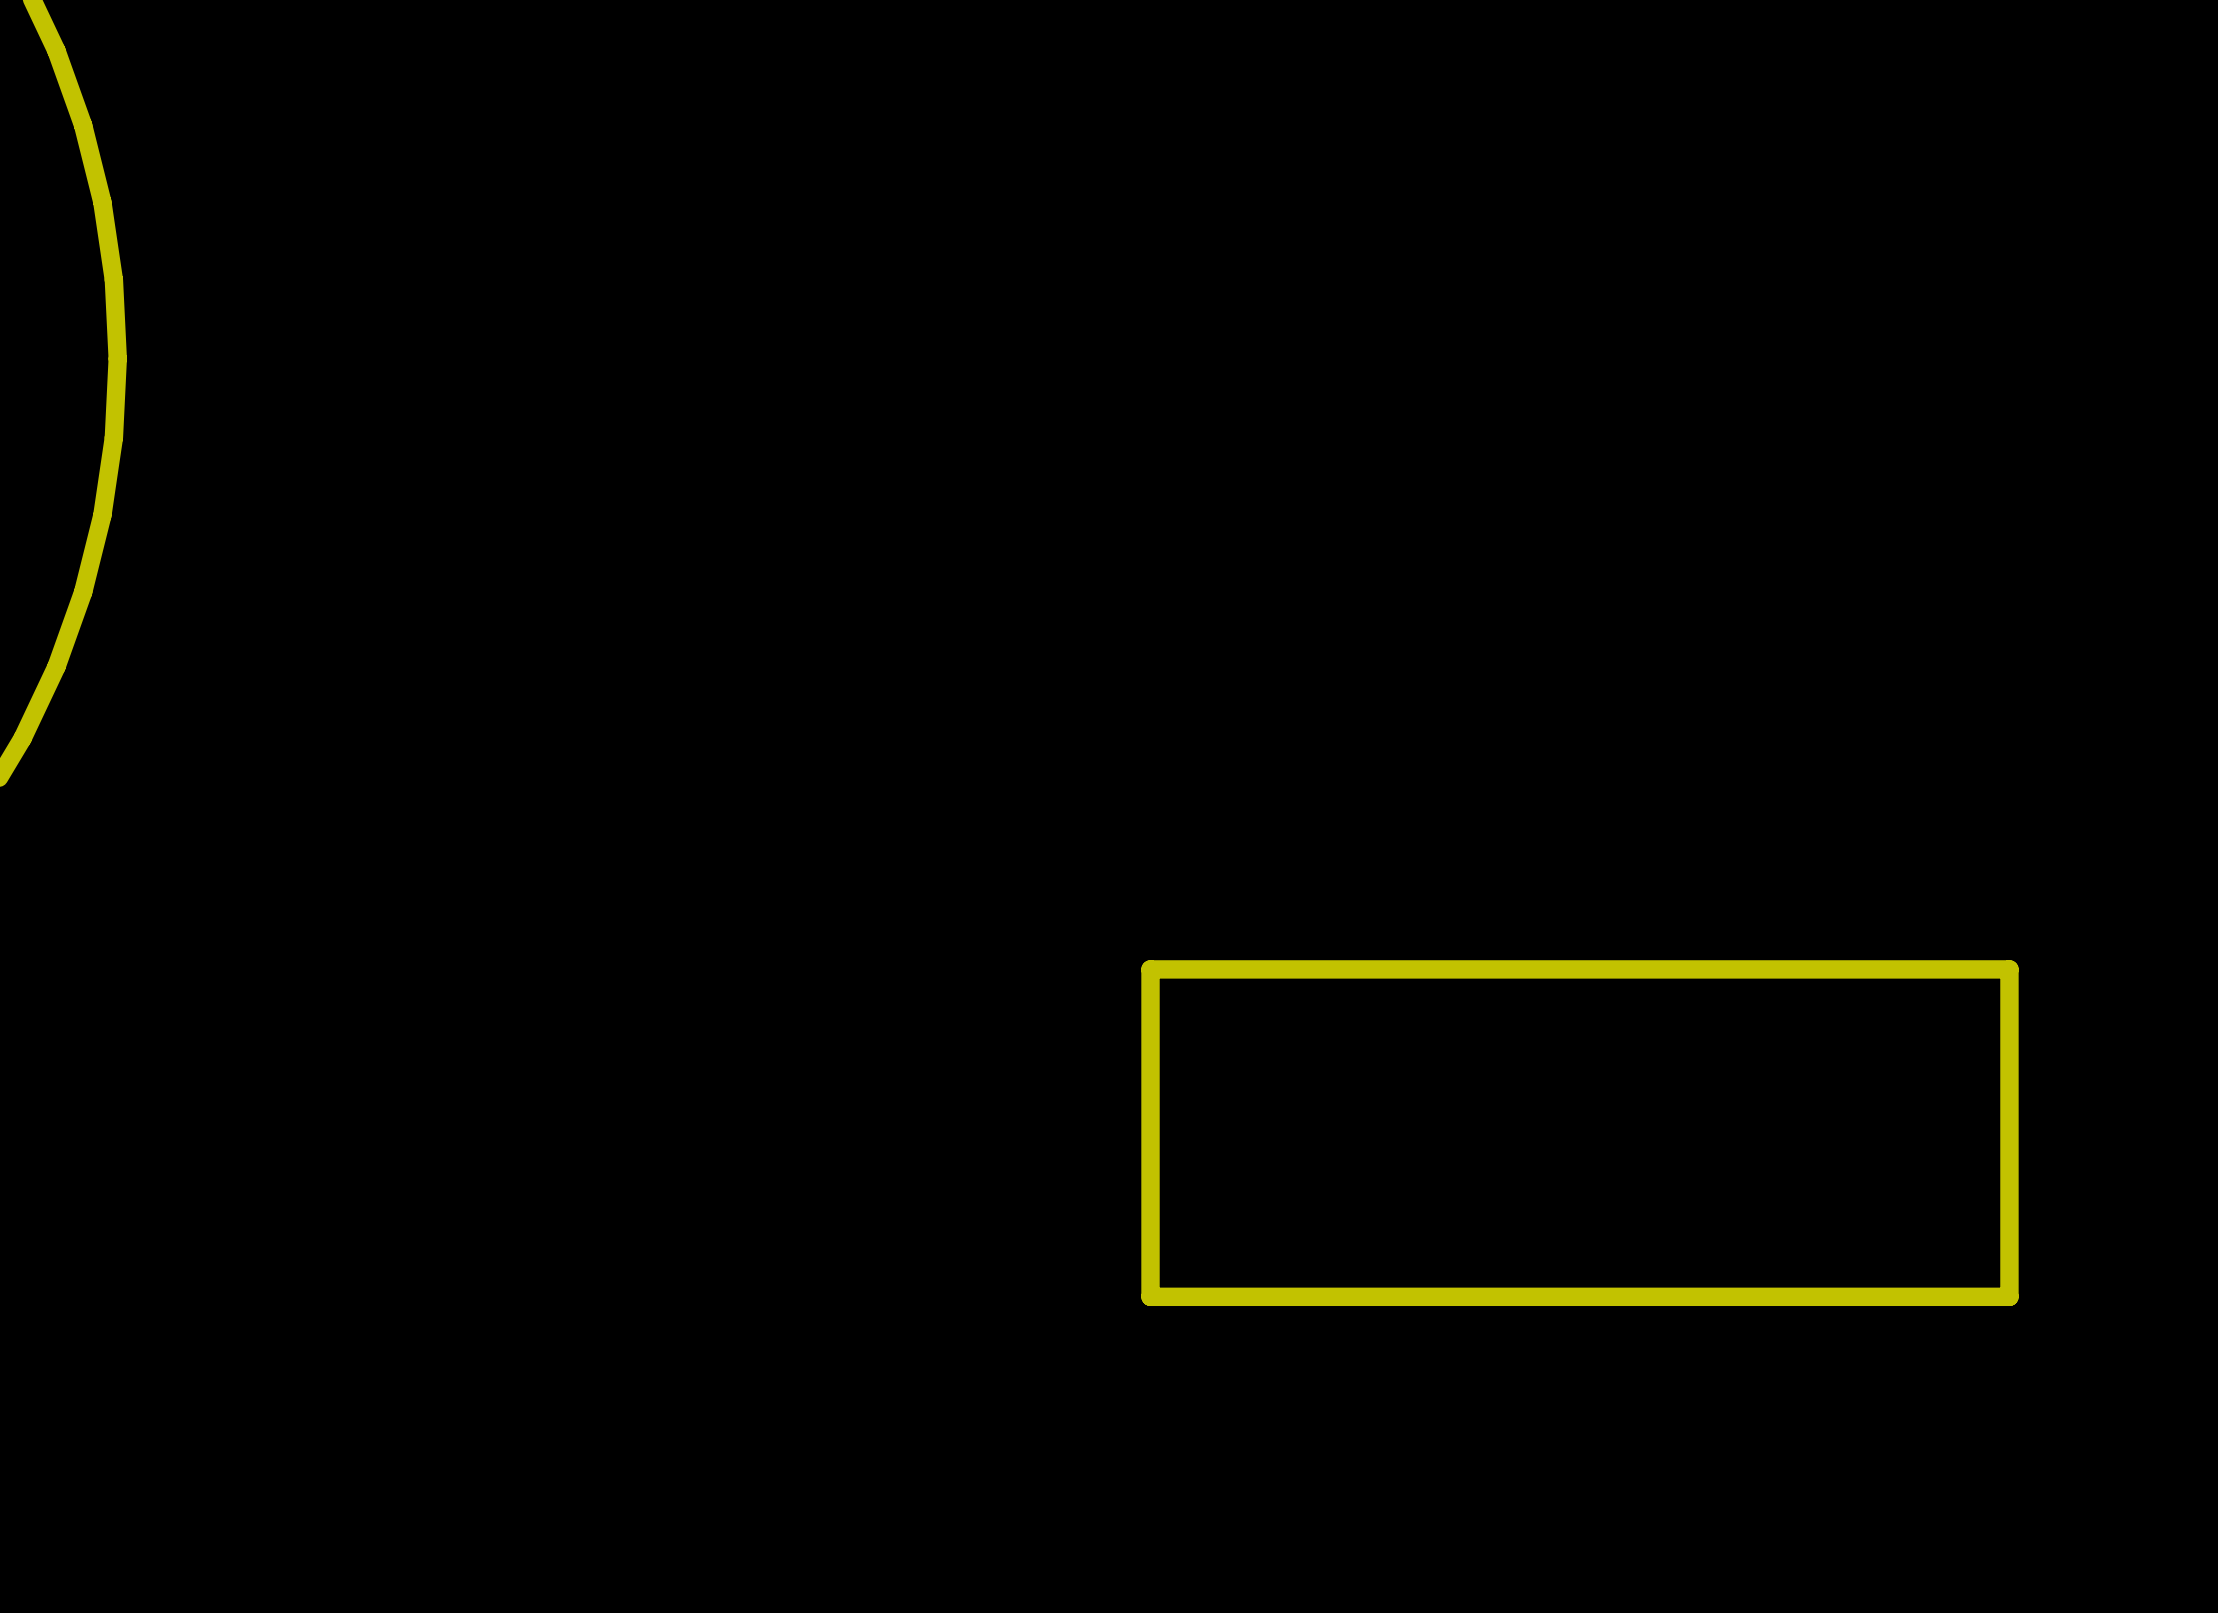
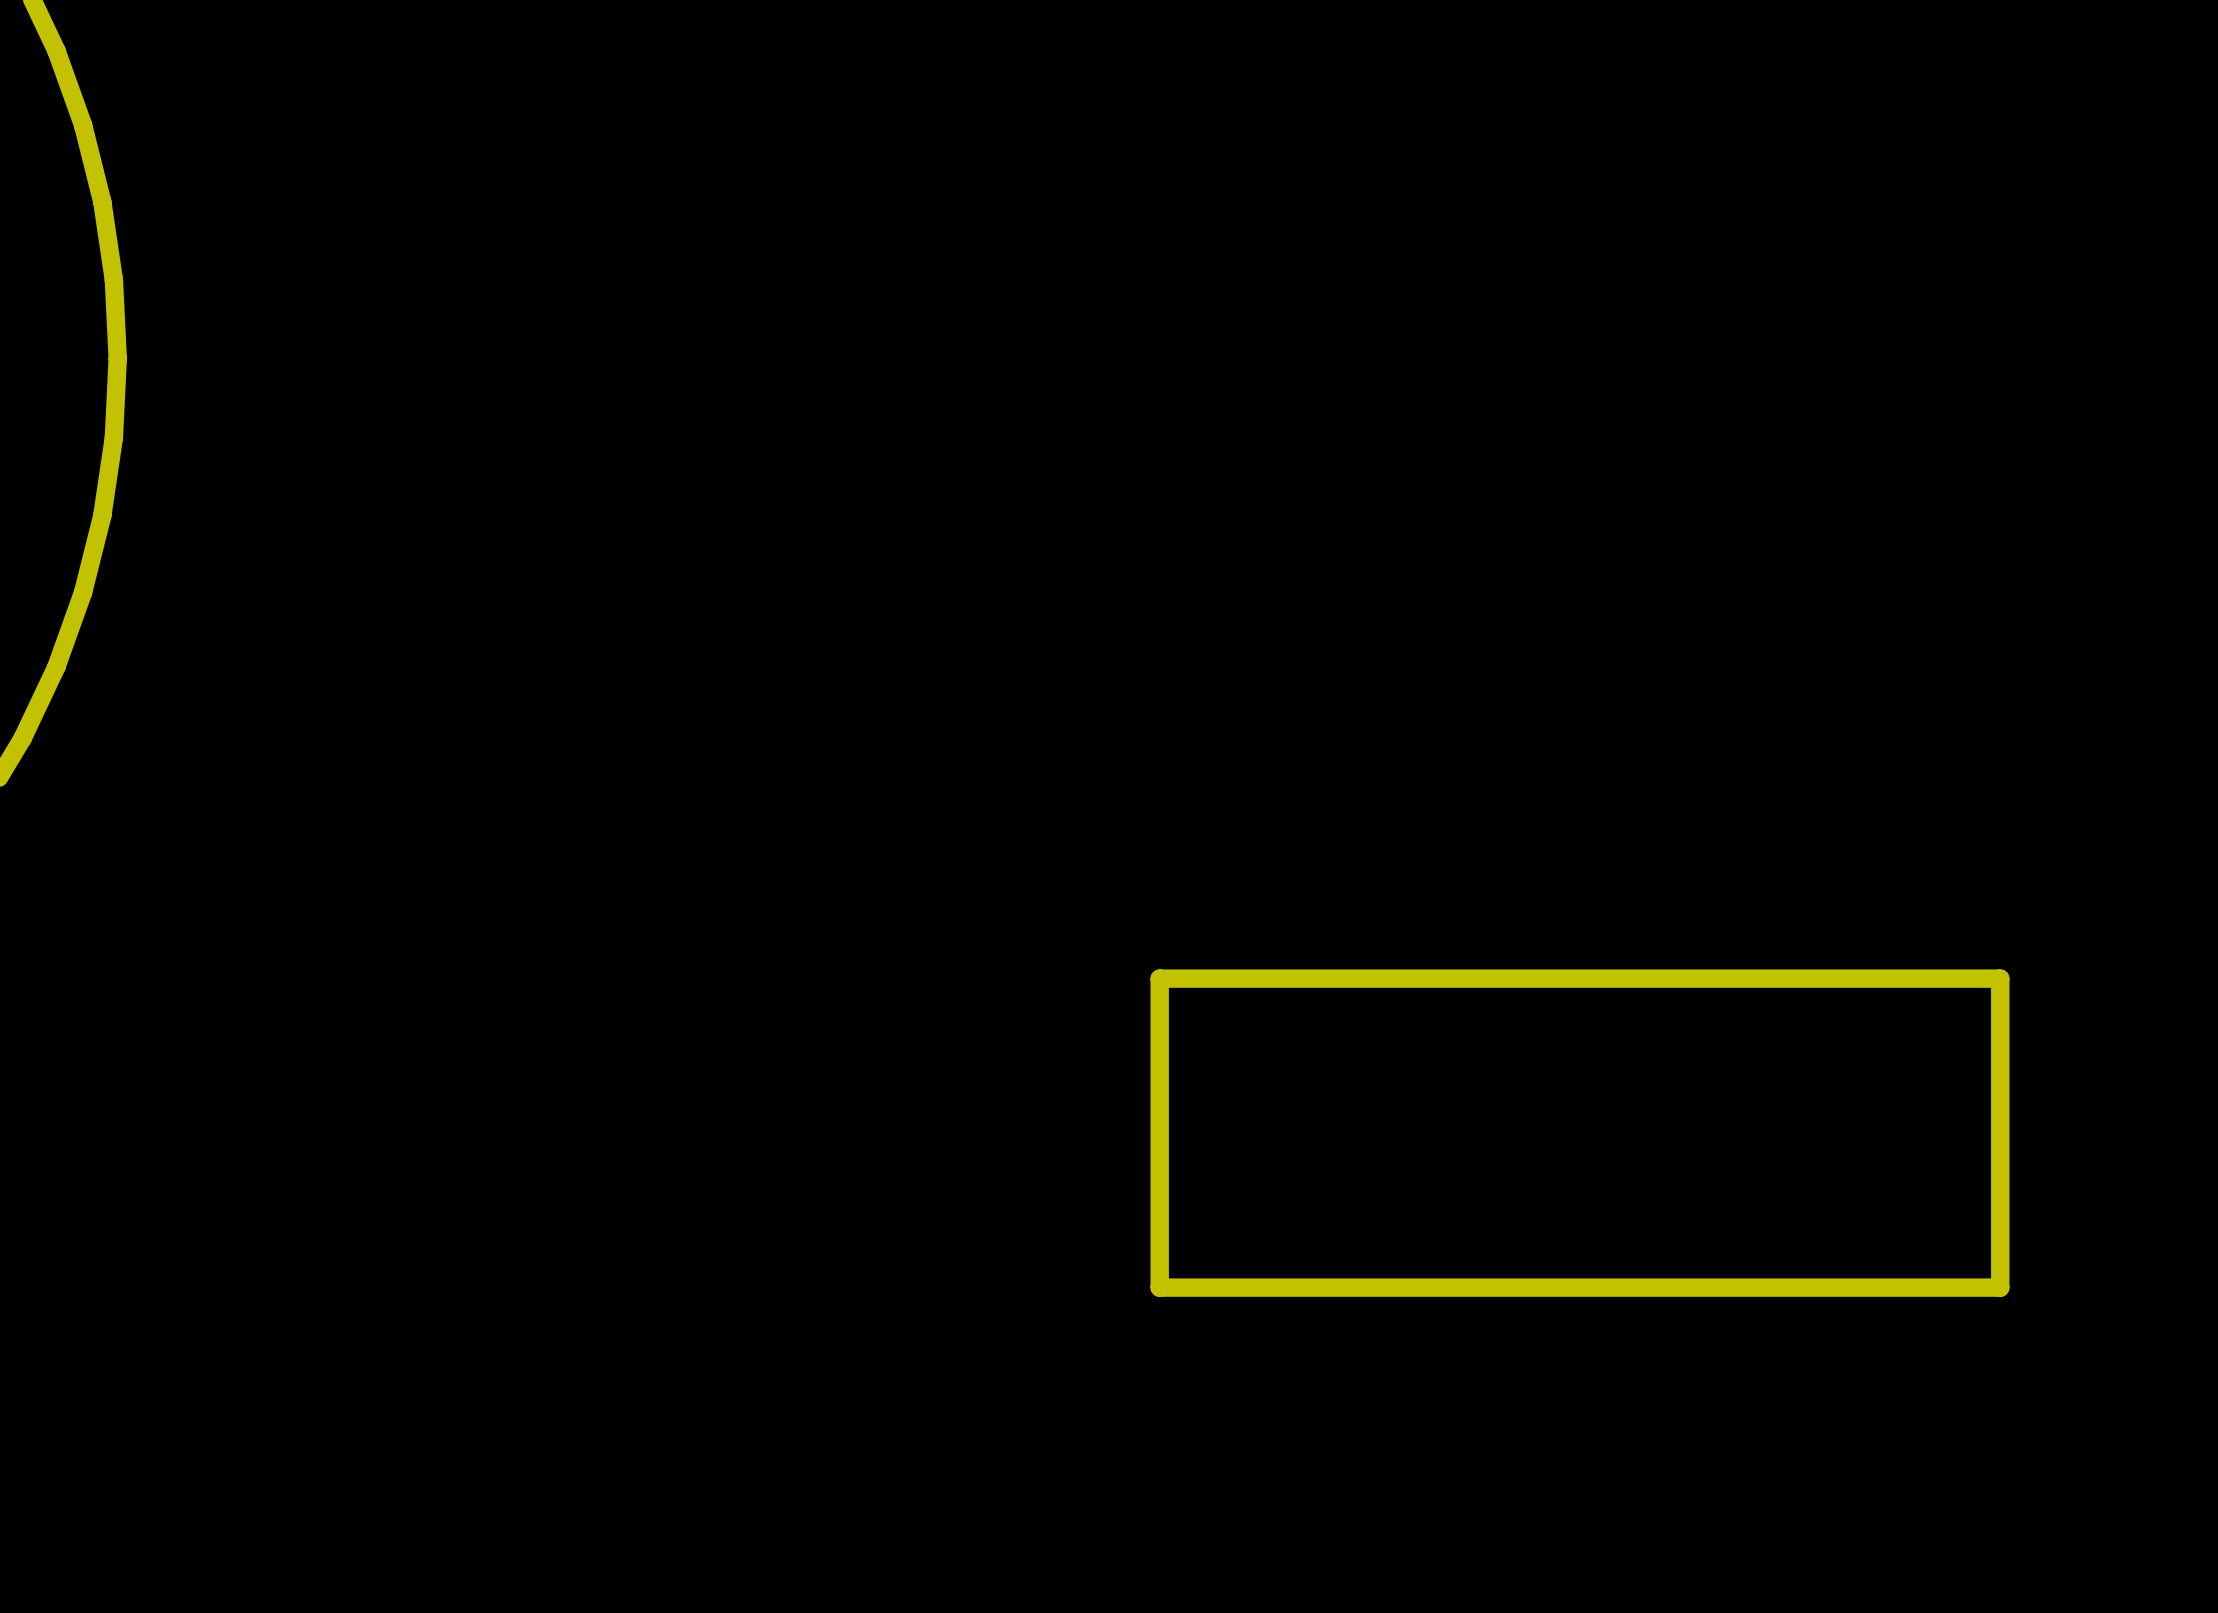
board edge: (2009, 969) (1150, 969) (1150, 1296) (2009, 1296) (2009, 969) -> (2000, 978) (2000, 1287) (1159, 1287) (1159, 978) (2000, 978)

